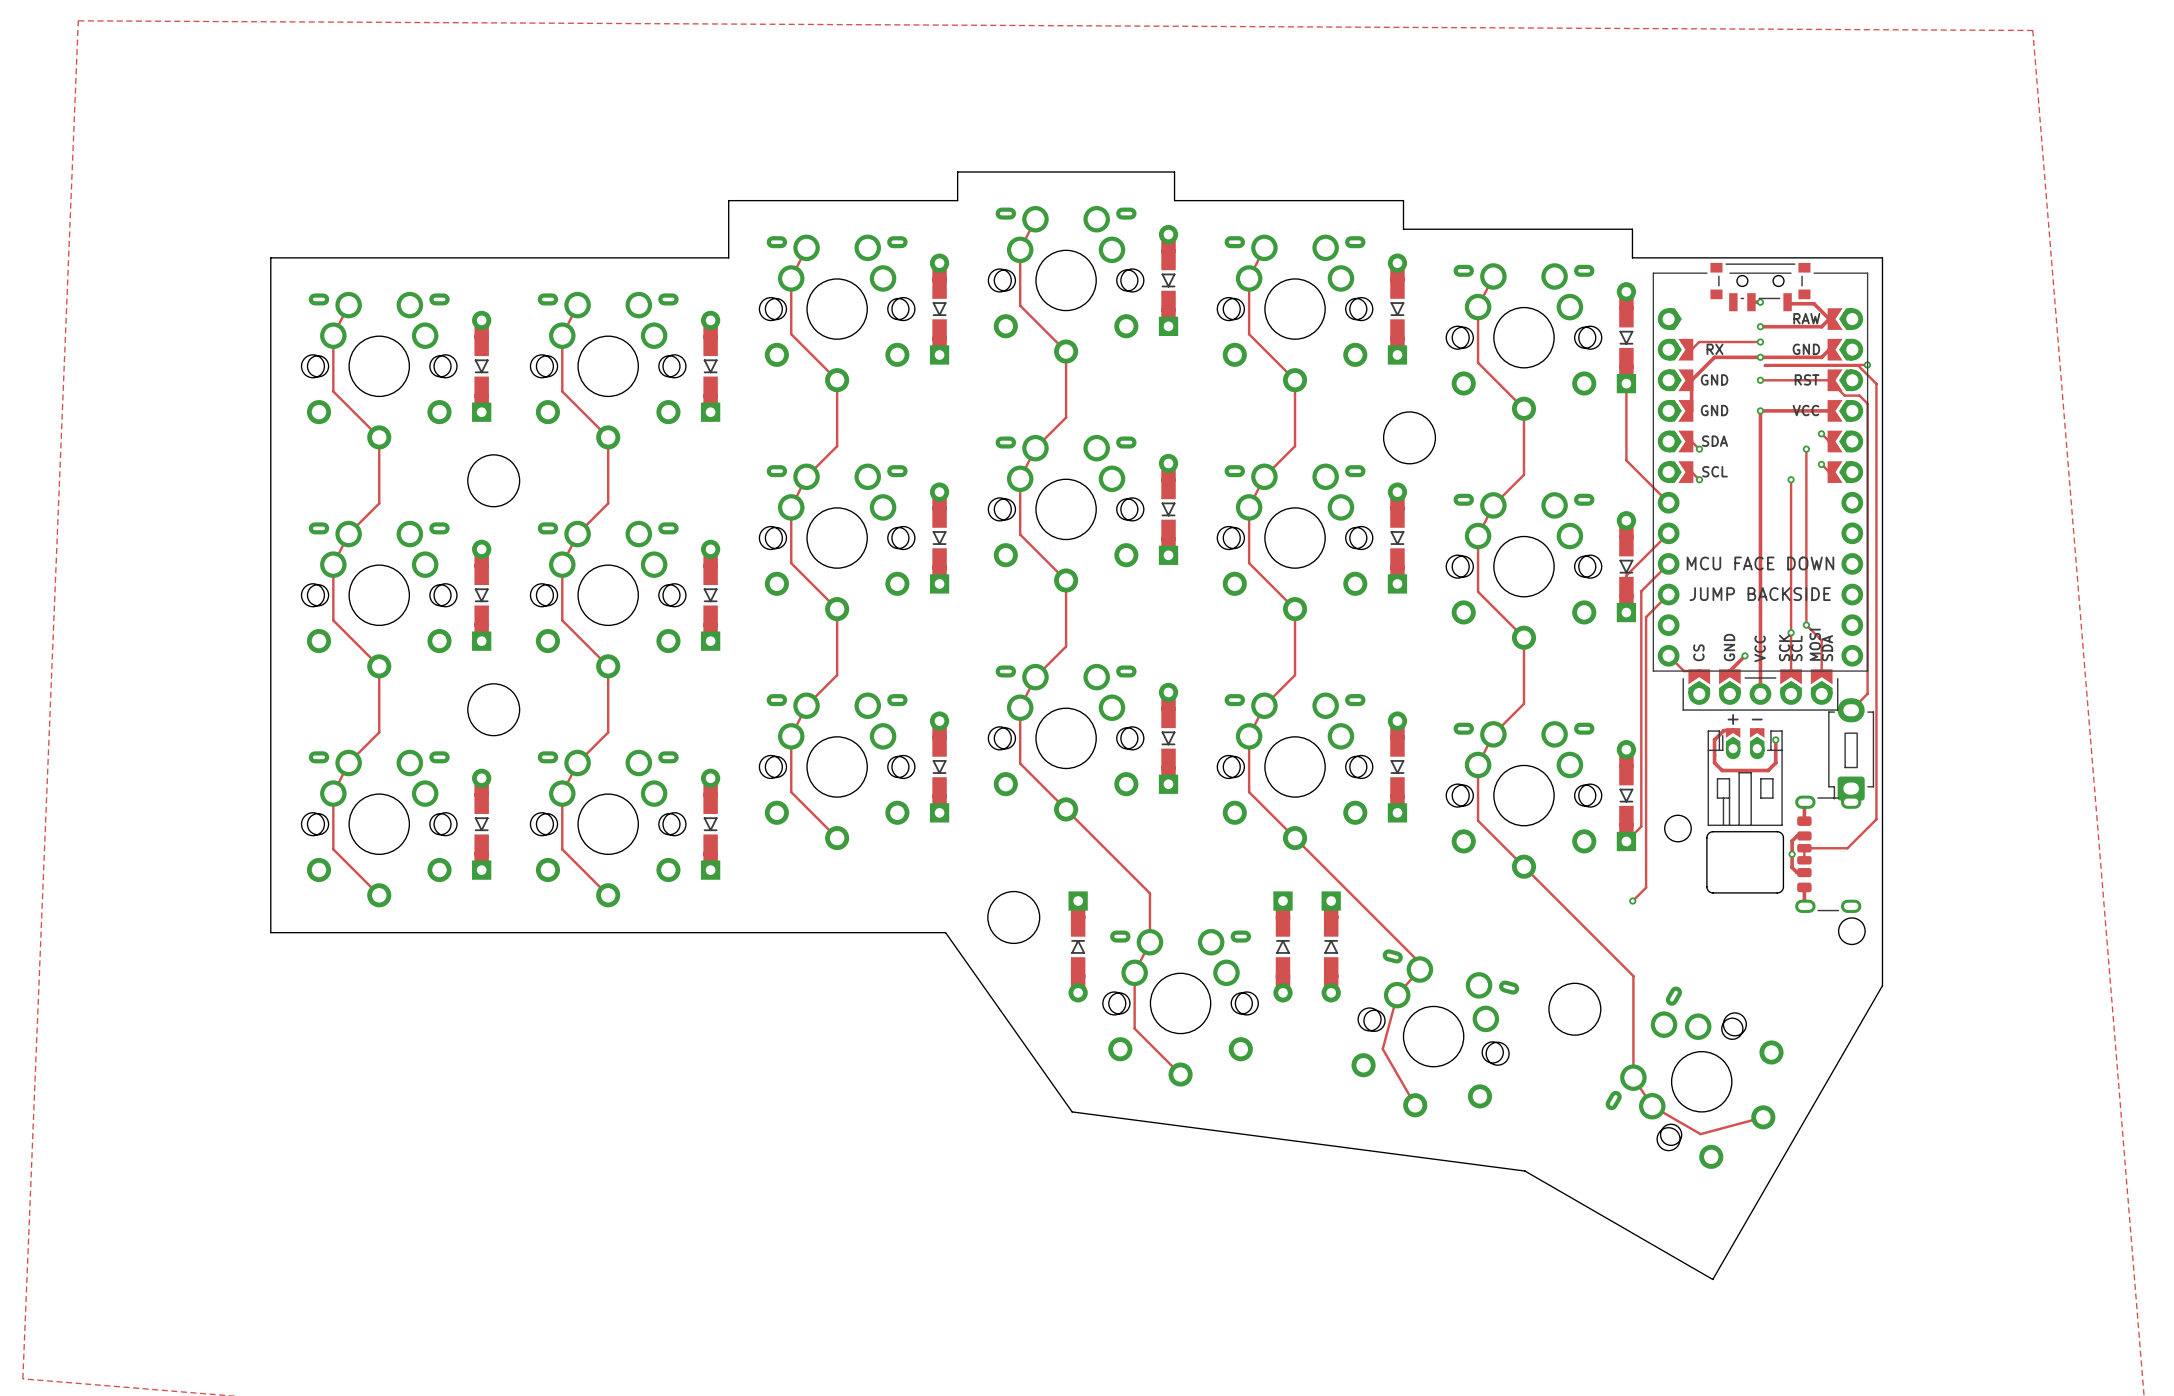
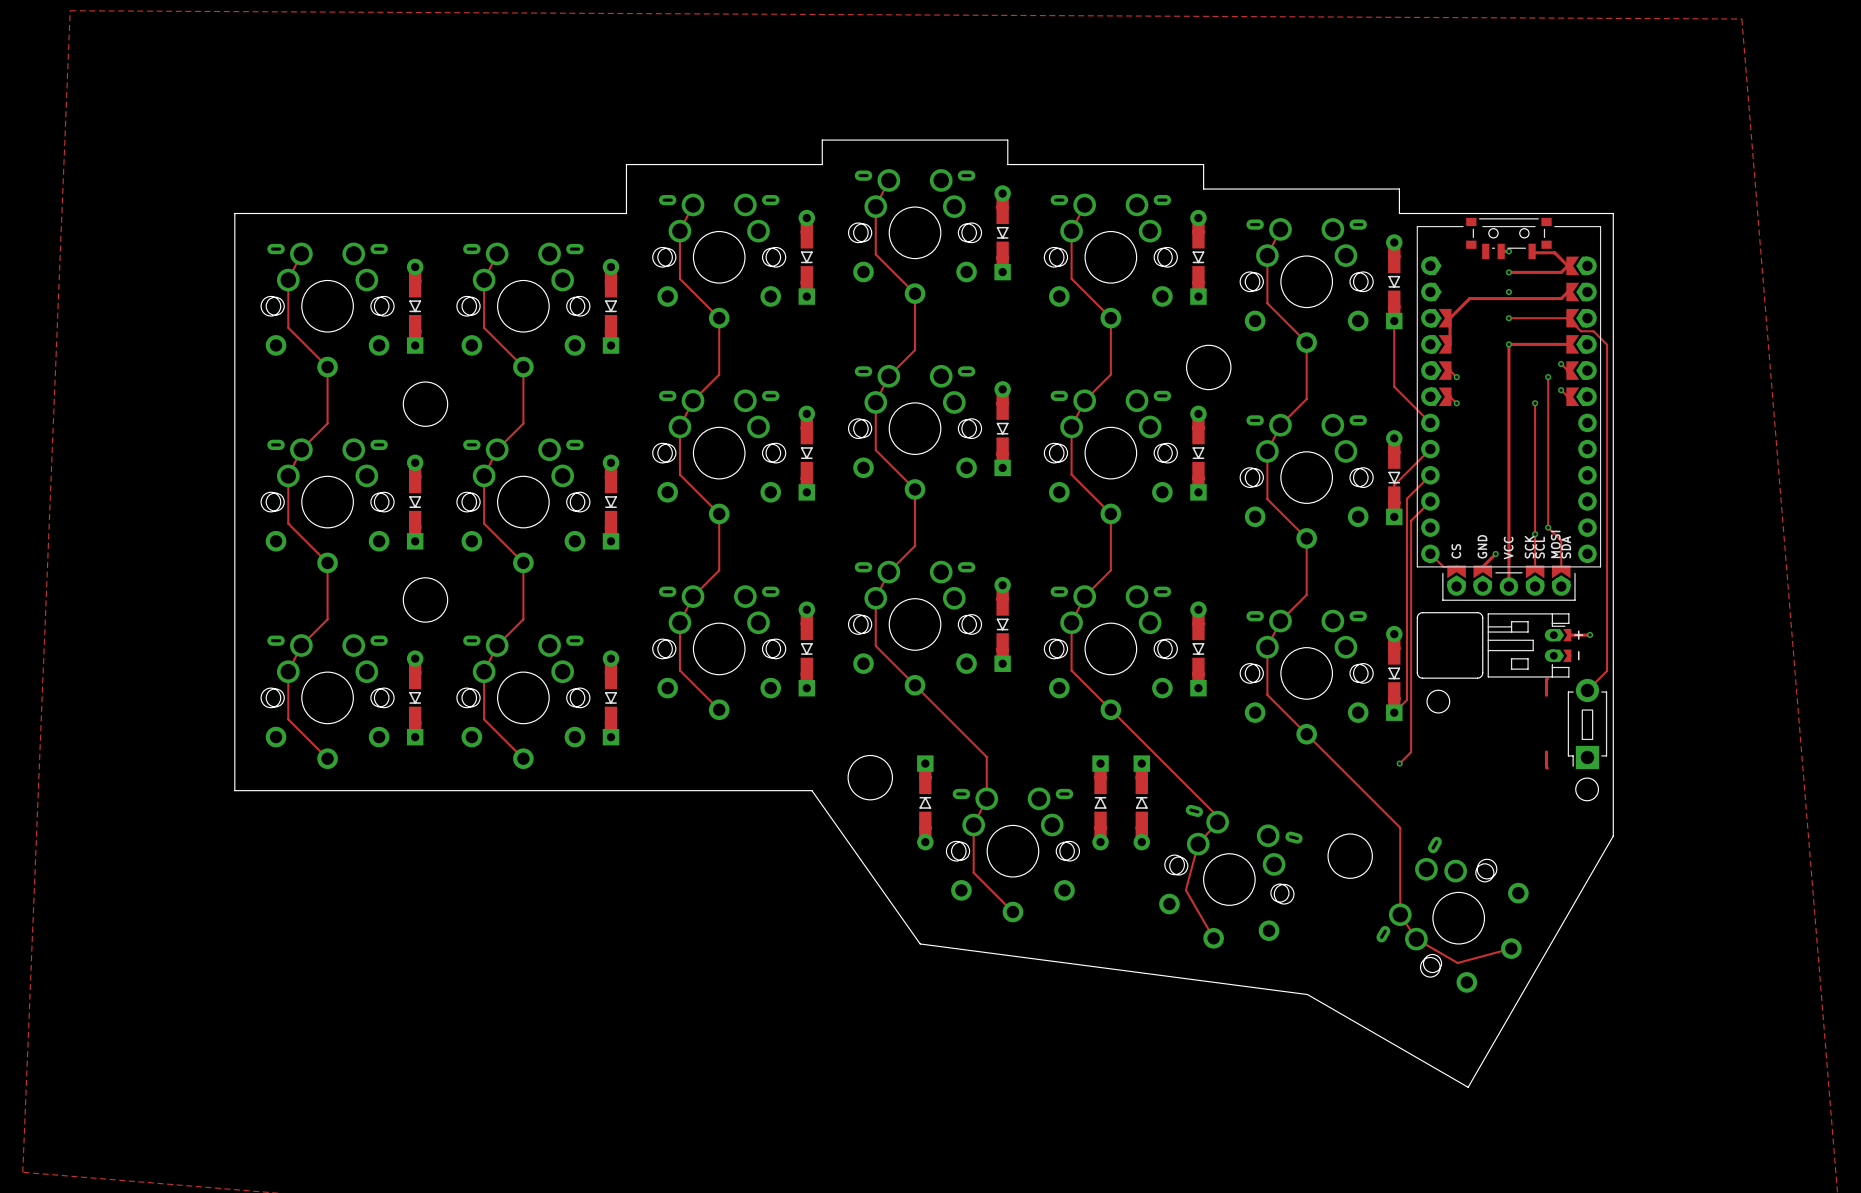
part footprint: [1652, 272, 1869, 672] -> [1416, 226, 1602, 568]
track: (1760, 342) (1699, 342) (1691, 349) -> none
via: (1760, 342) -> none
via: none -> (1508, 292)
via: (1760, 357) -> none
track: (1867, 364) (1764, 365) (1858, 365) (1876, 383) (1876, 819) (1847, 848) (1804, 848) (1804, 860) -> none
via: (1867, 364) -> none
track: (1867, 403) (1867, 693) (1851, 710) -> (1600, 338) (1607, 344) (1607, 670) (1587, 690)
board edge: none -> (1422, 612) (1481, 614) (1482, 672) (1481, 676) (1422, 678) (1418, 676) (1417, 617) (1418, 614) (1422, 612)
track: (1733, 730) (1723, 730) (1714, 739) (1714, 762) (1722, 770) (1768, 770) (1775, 762) (1775, 739) -> none
via: (1775, 739) -> none
part: (1851, 749) -> none
track: none -> (1590, 634) (1569, 635)
via: none -> (1590, 634)
part rotation: 0° (1745, 777) -> 90° clockwise (1529, 645)
board edge: (1713, 831) (1781, 833) (1783, 837) (1782, 890) (1777, 892) (1709, 891) (1706, 886) (1706, 837) (1708, 833) (1713, 831) -> none
track: (1804, 835) (1797, 835) (1792, 841) (1792, 867) (1797, 872) (1804, 872) -> none
via: (1792, 854) -> none
part: (1828, 854) -> none
part: none -> (1587, 723)

